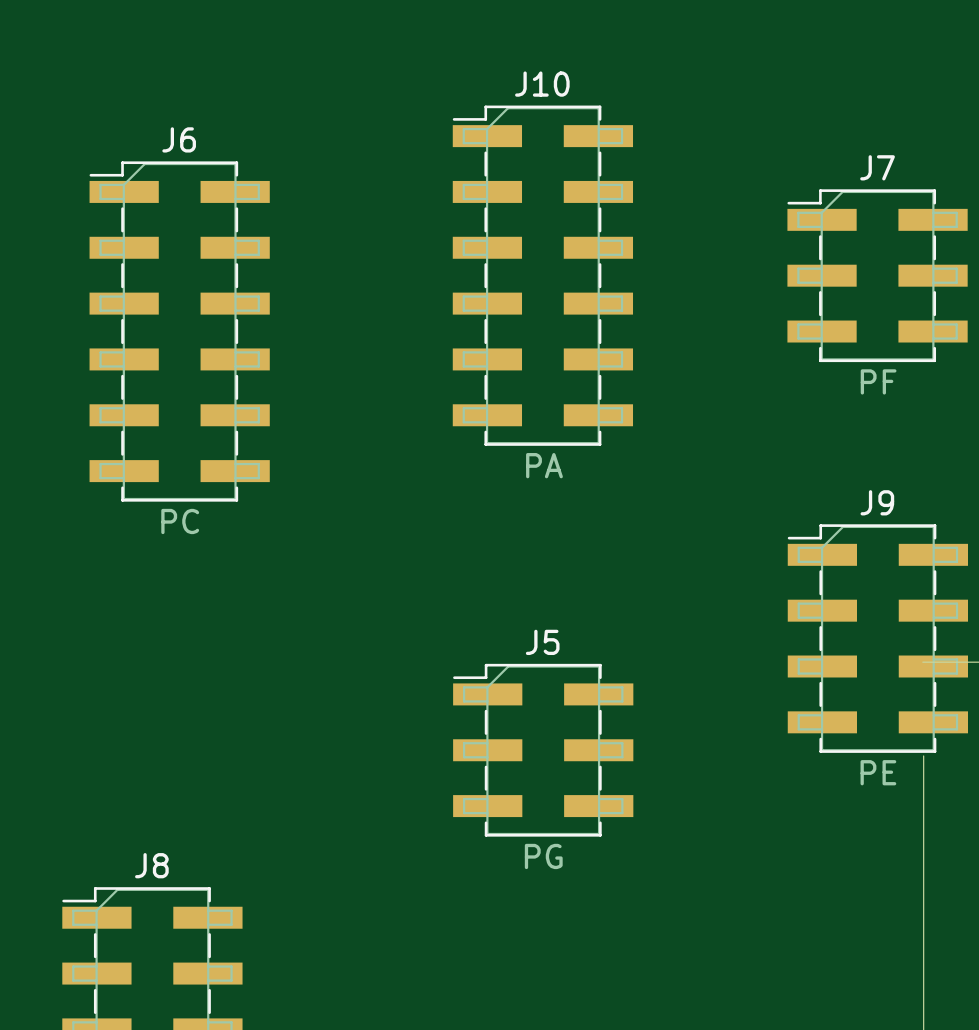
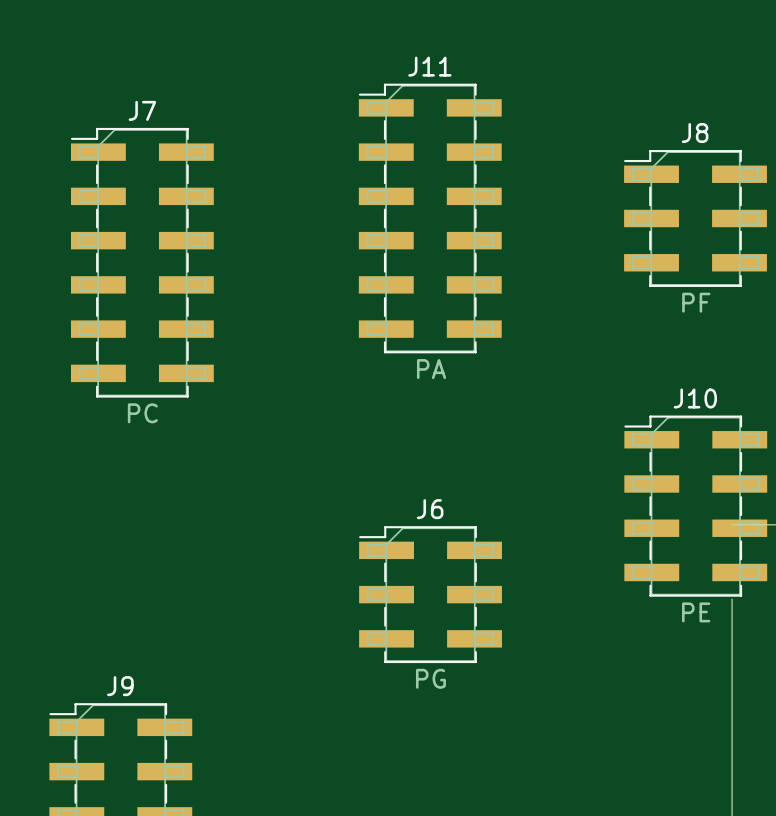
J10 name: J10 (542, 84) -> J11 (429, 66)
J6 name: J6 (179, 139) -> J7 (142, 110)
J7 name: J7 (877, 167) -> J8 (695, 133)
J9 name: J9 (877, 502) -> J10 (695, 398)
J5 name: J5 (542, 642) -> J6 (430, 509)
J8 name: J8 (151, 865) -> J9 (120, 686)

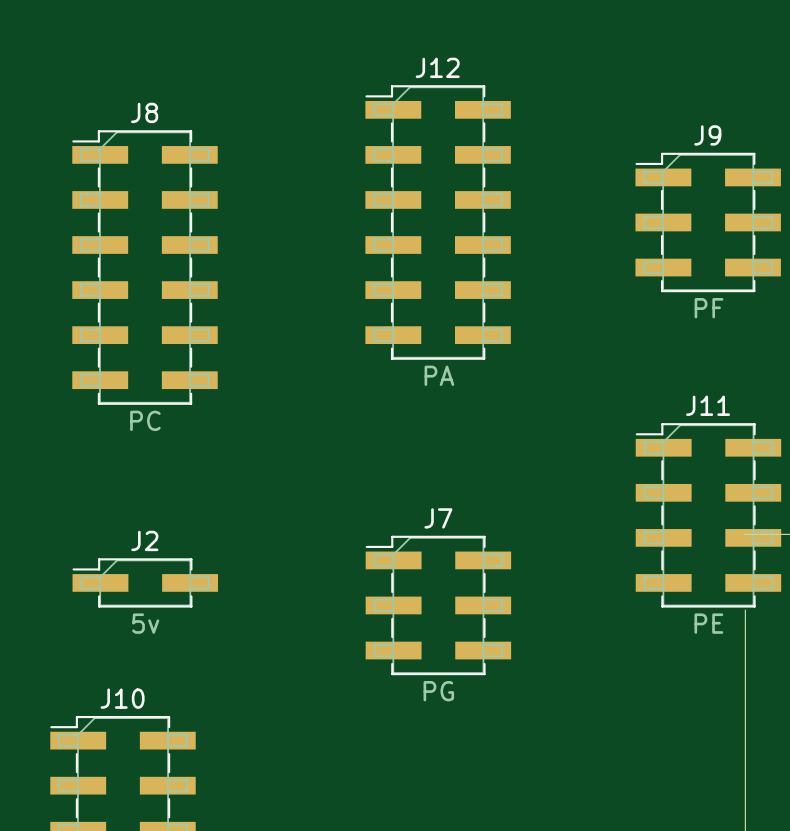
J11 name: J11 (429, 66) -> J12 (437, 67)
J7 name: J7 (142, 110) -> J8 (144, 112)
J8 name: J8 (695, 133) -> J9 (707, 135)
J10 name: J10 (695, 398) -> J11 (708, 405)
J6 name: J6 (430, 509) -> J7 (438, 518)
J2: none -> 5v (145, 582)
J9 name: J9 (120, 686) -> J10 (122, 698)

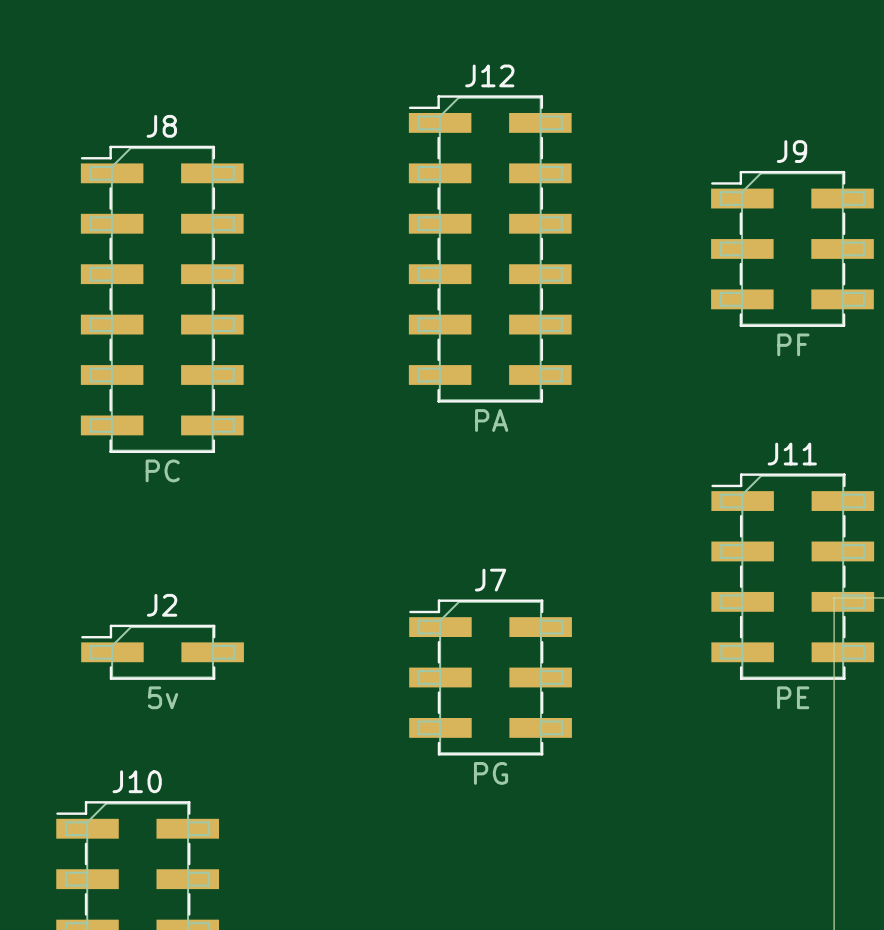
board edge: none -> (834, 597) (834, 682)

